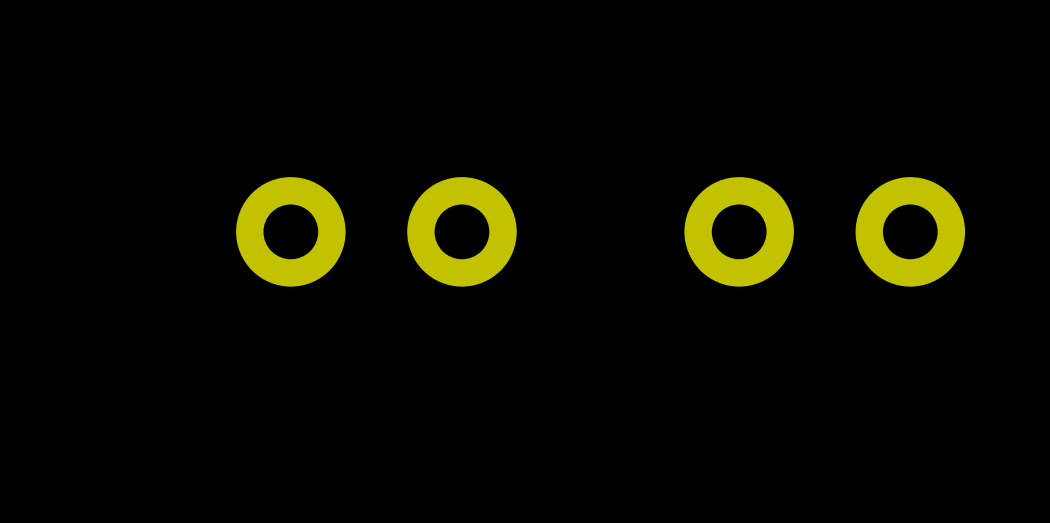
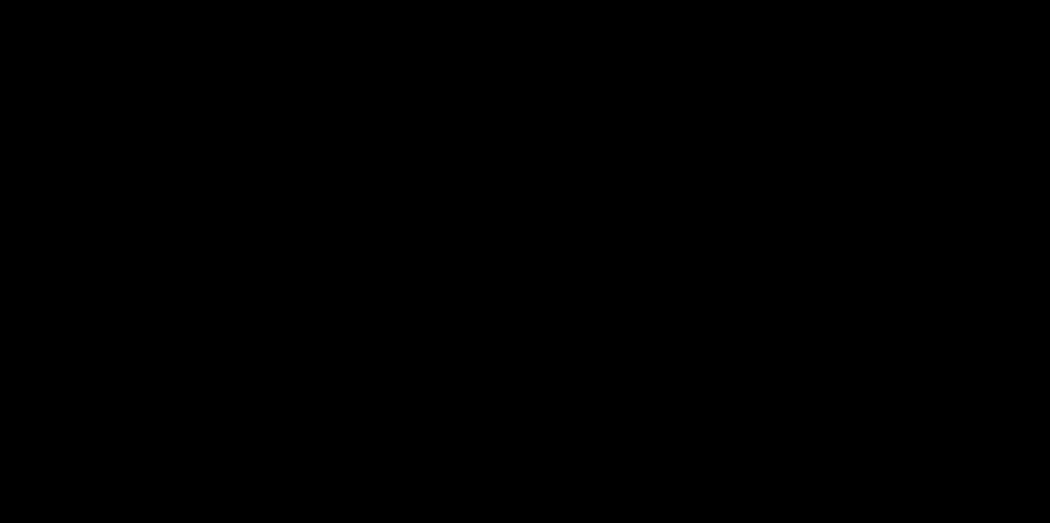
part: (376, 231) -> none
part: (824, 231) -> none

